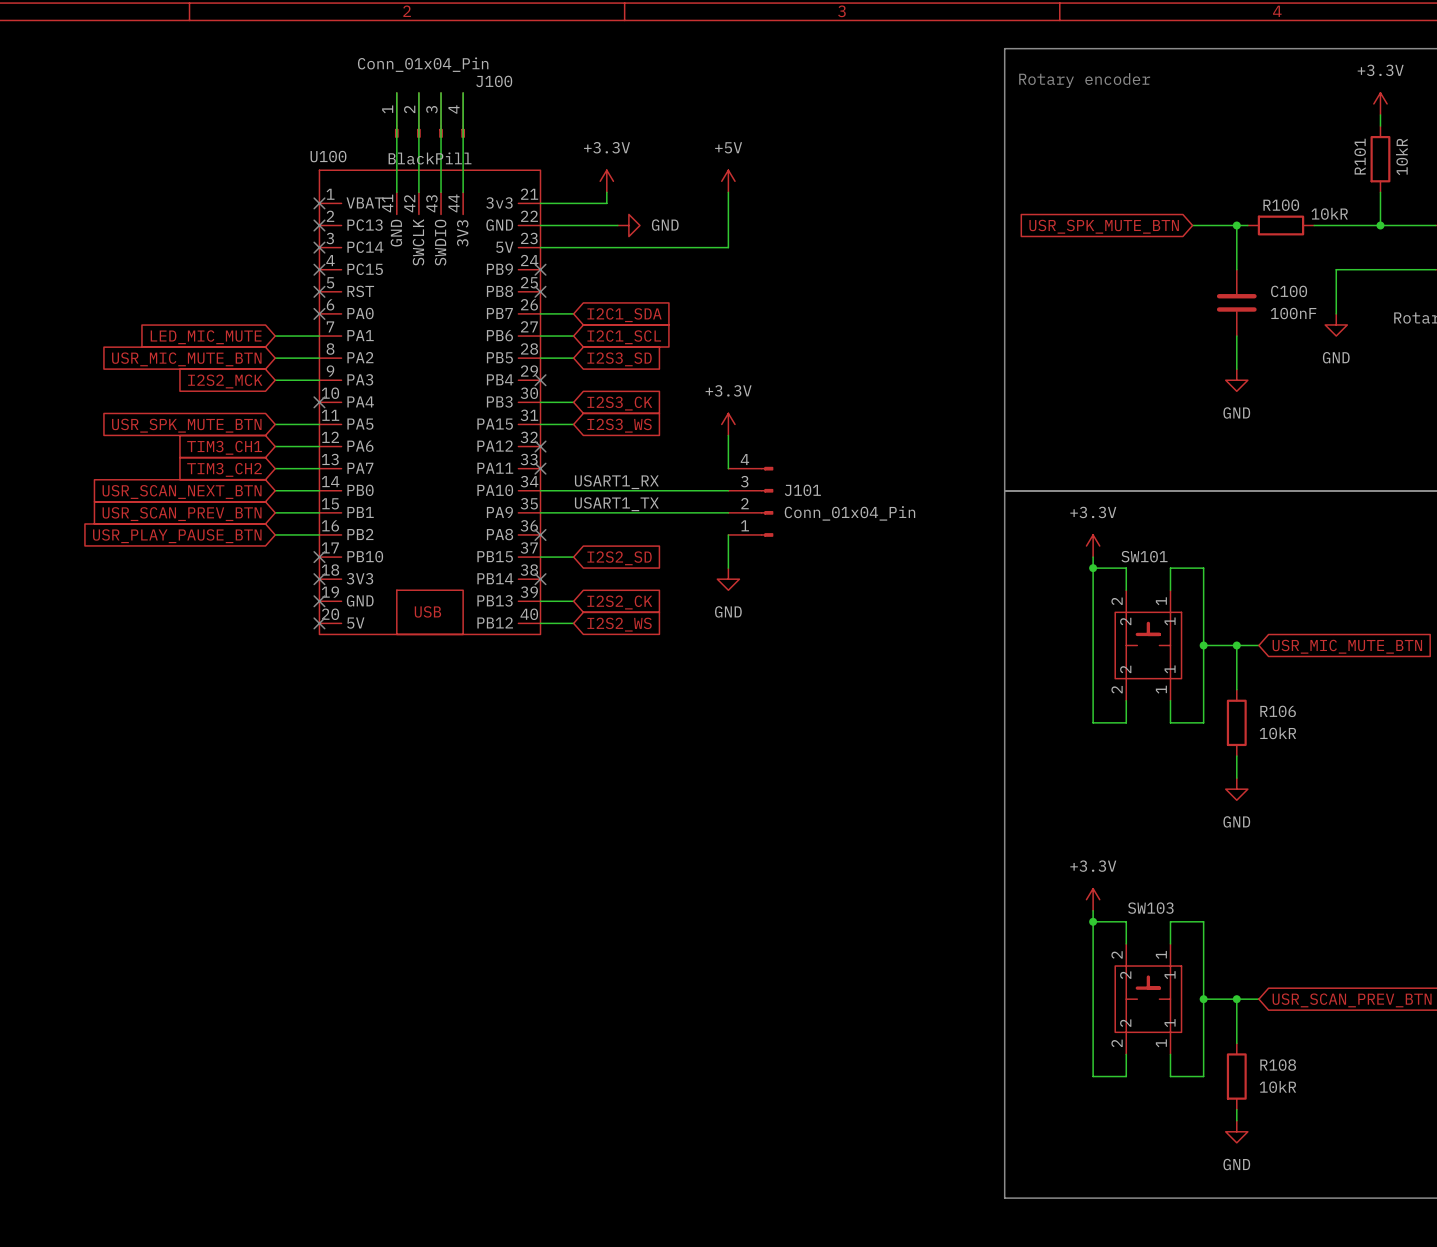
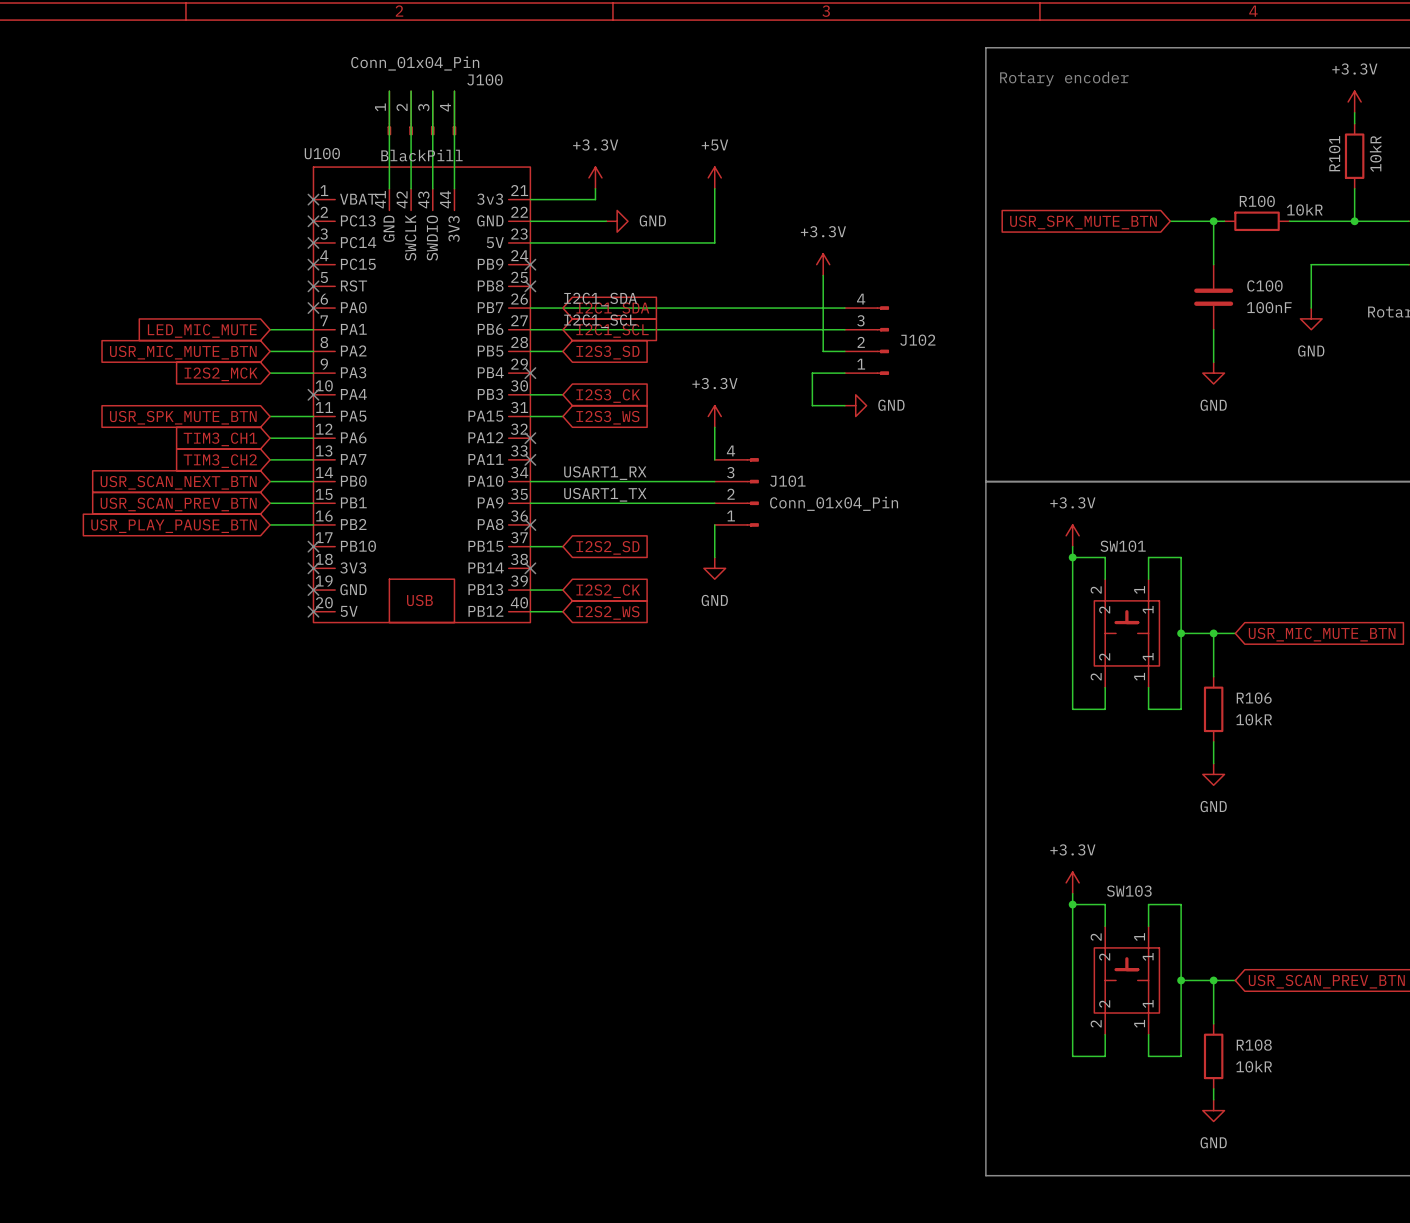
power symbol: none -> +3.3V (823, 264)
wire: none -> (823, 275) (823, 351) (844, 351)
label: none -> I2C1_SDA (600, 299)
wire: none -> (562, 308) (844, 308)
label: none -> I2C1_SCL (600, 321)
wire: none -> (562, 329) (844, 329)
J102: none -> (866, 340)
wire: none -> (844, 373) (812, 373) (812, 405) (844, 405)
power symbol: none -> GND (855, 405)

